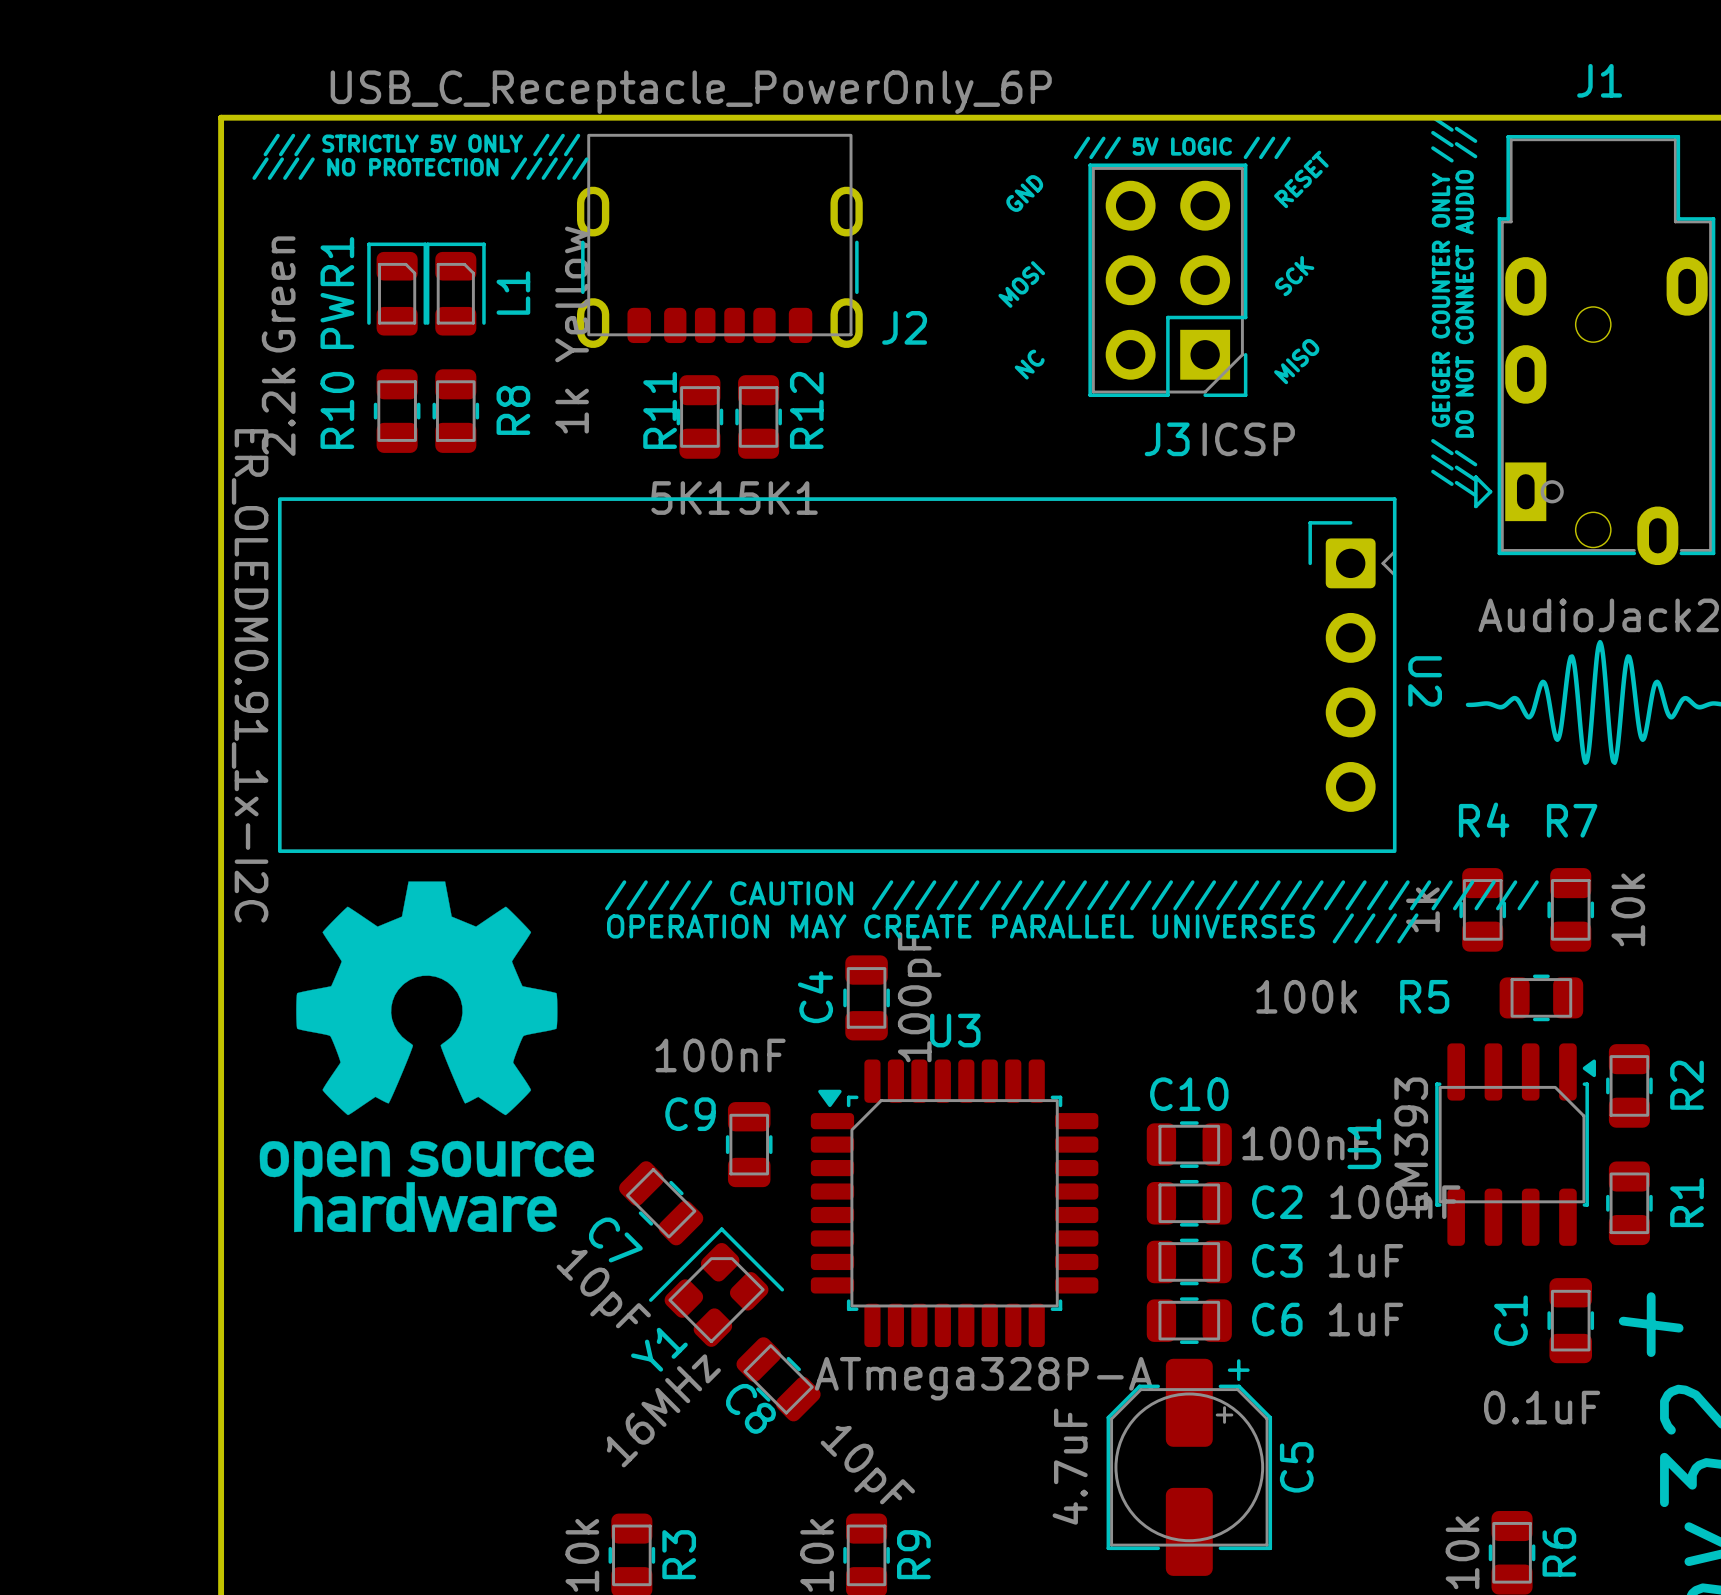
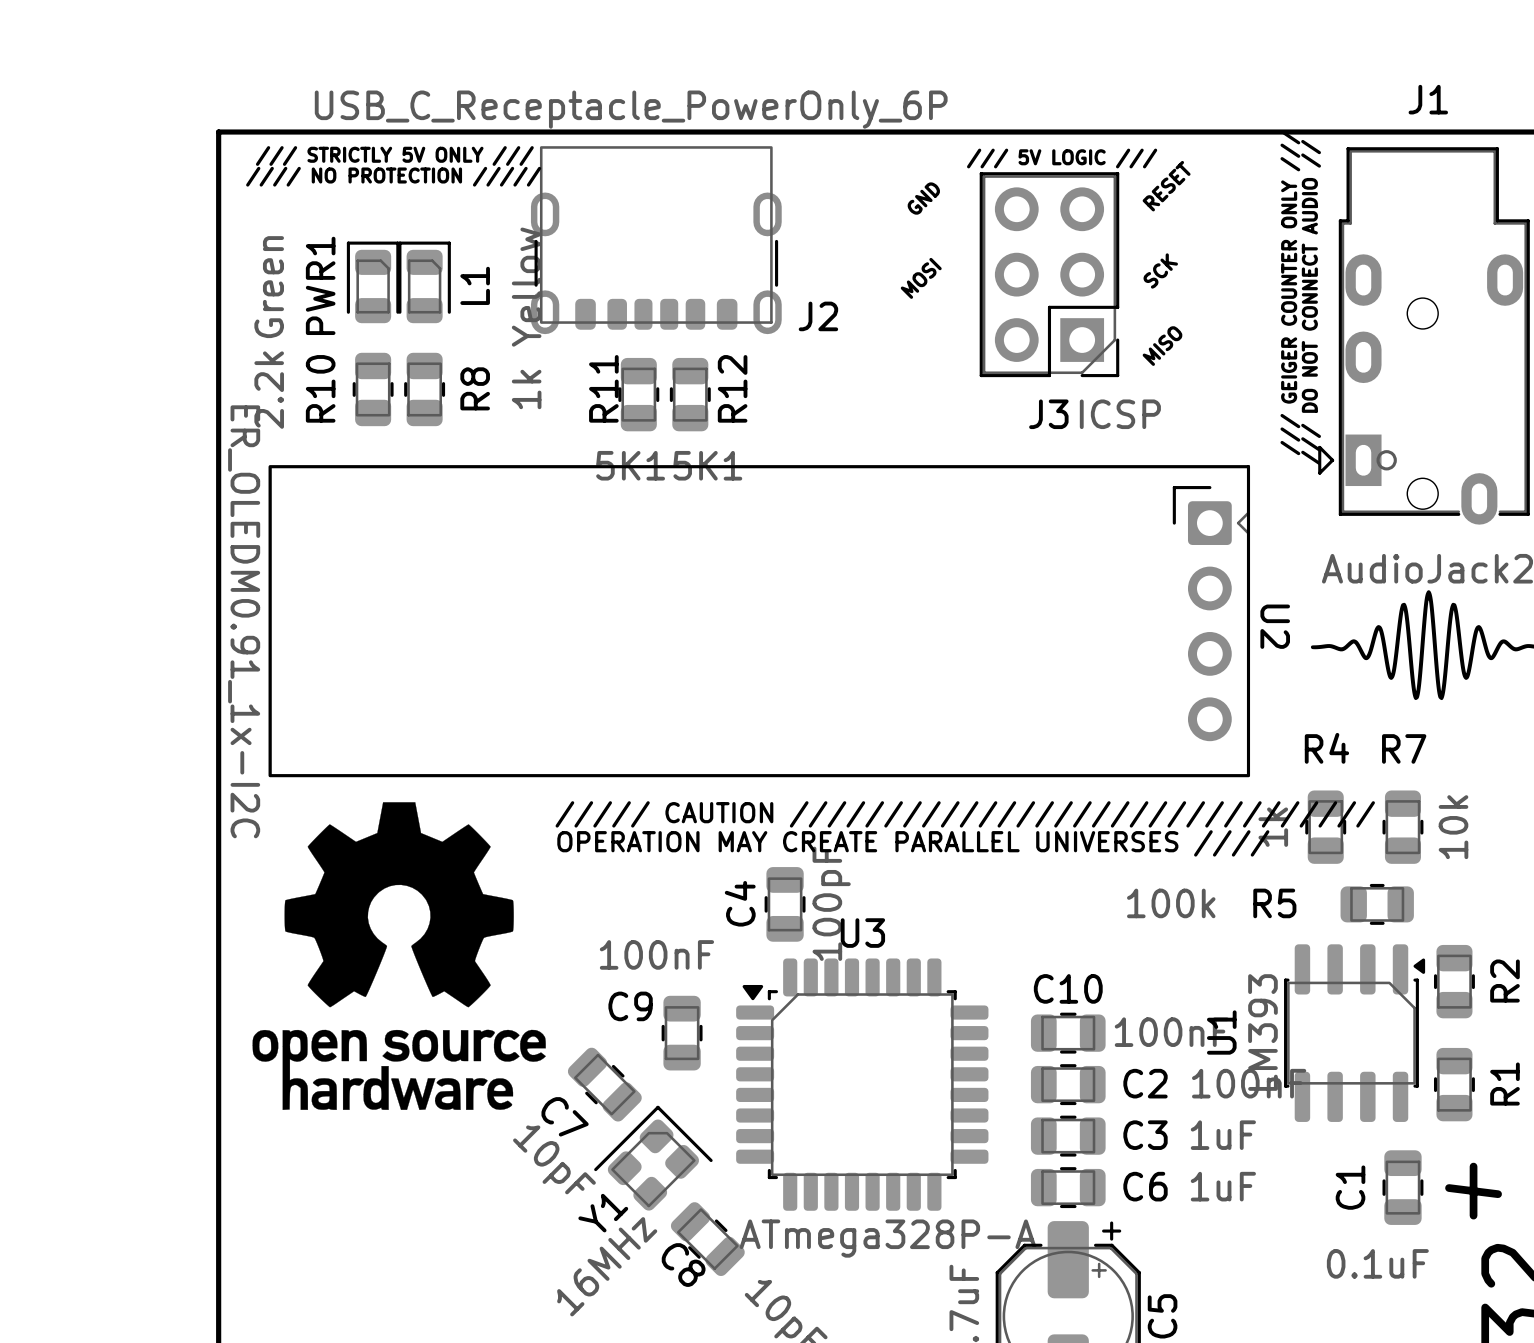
text: NC (1029, 364) -> none

